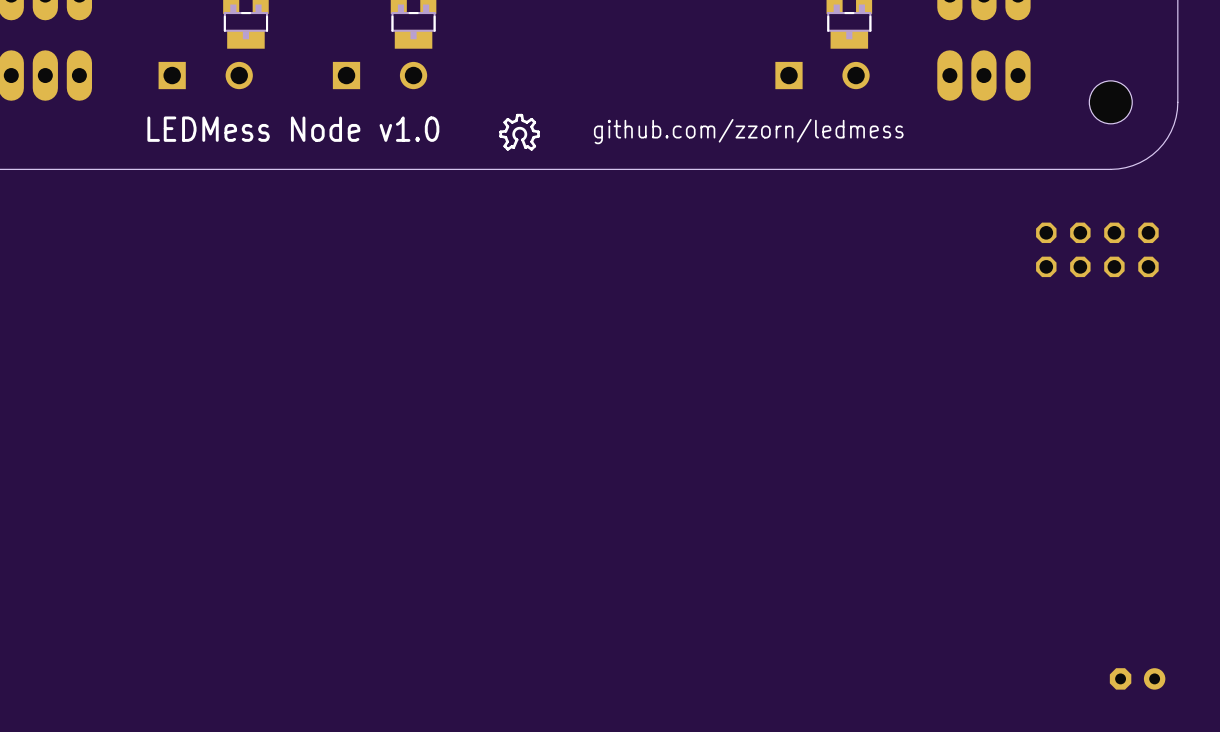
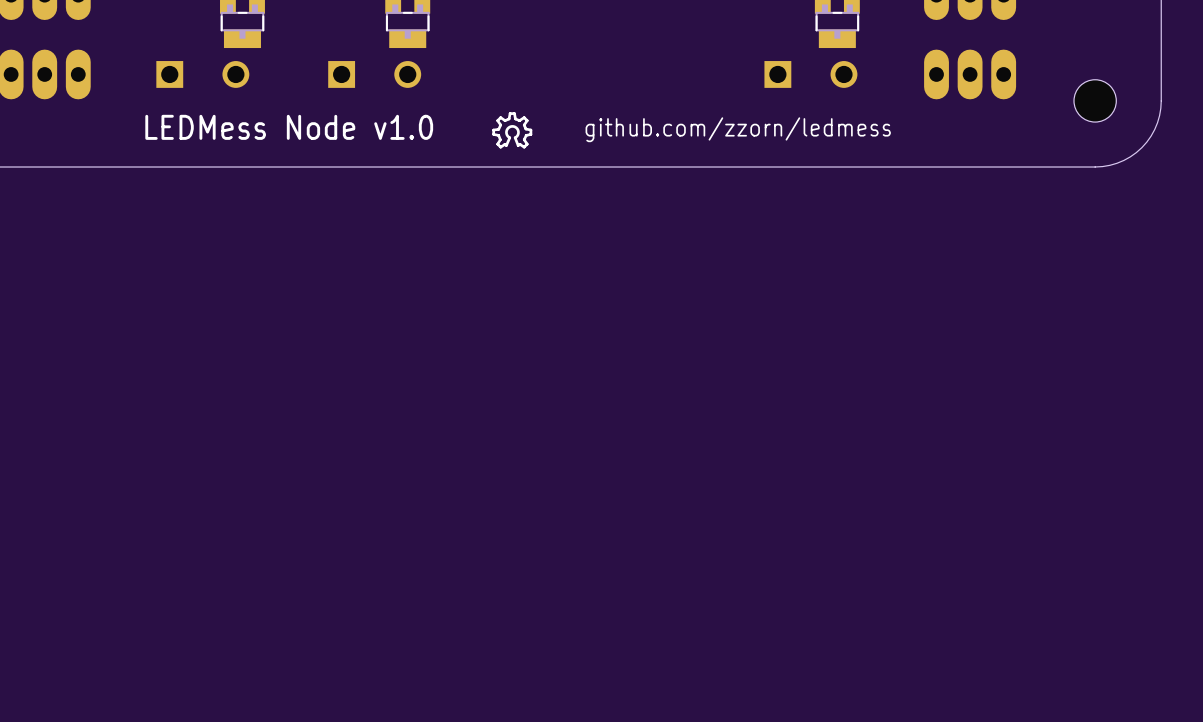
part: (1097, 249) -> none
part: (1137, 678) -> none

